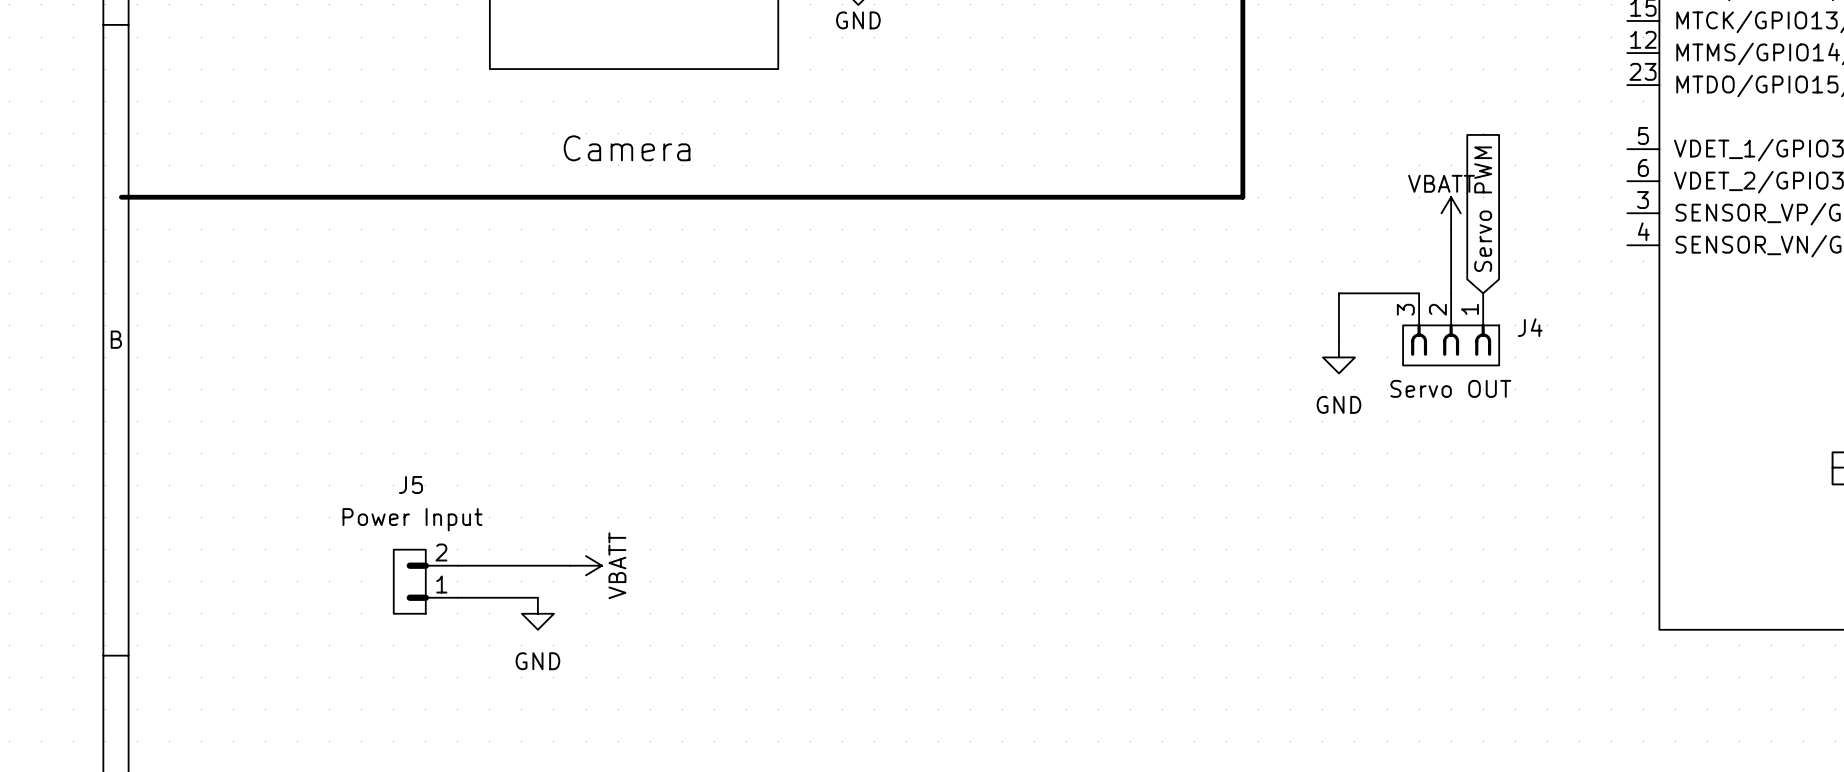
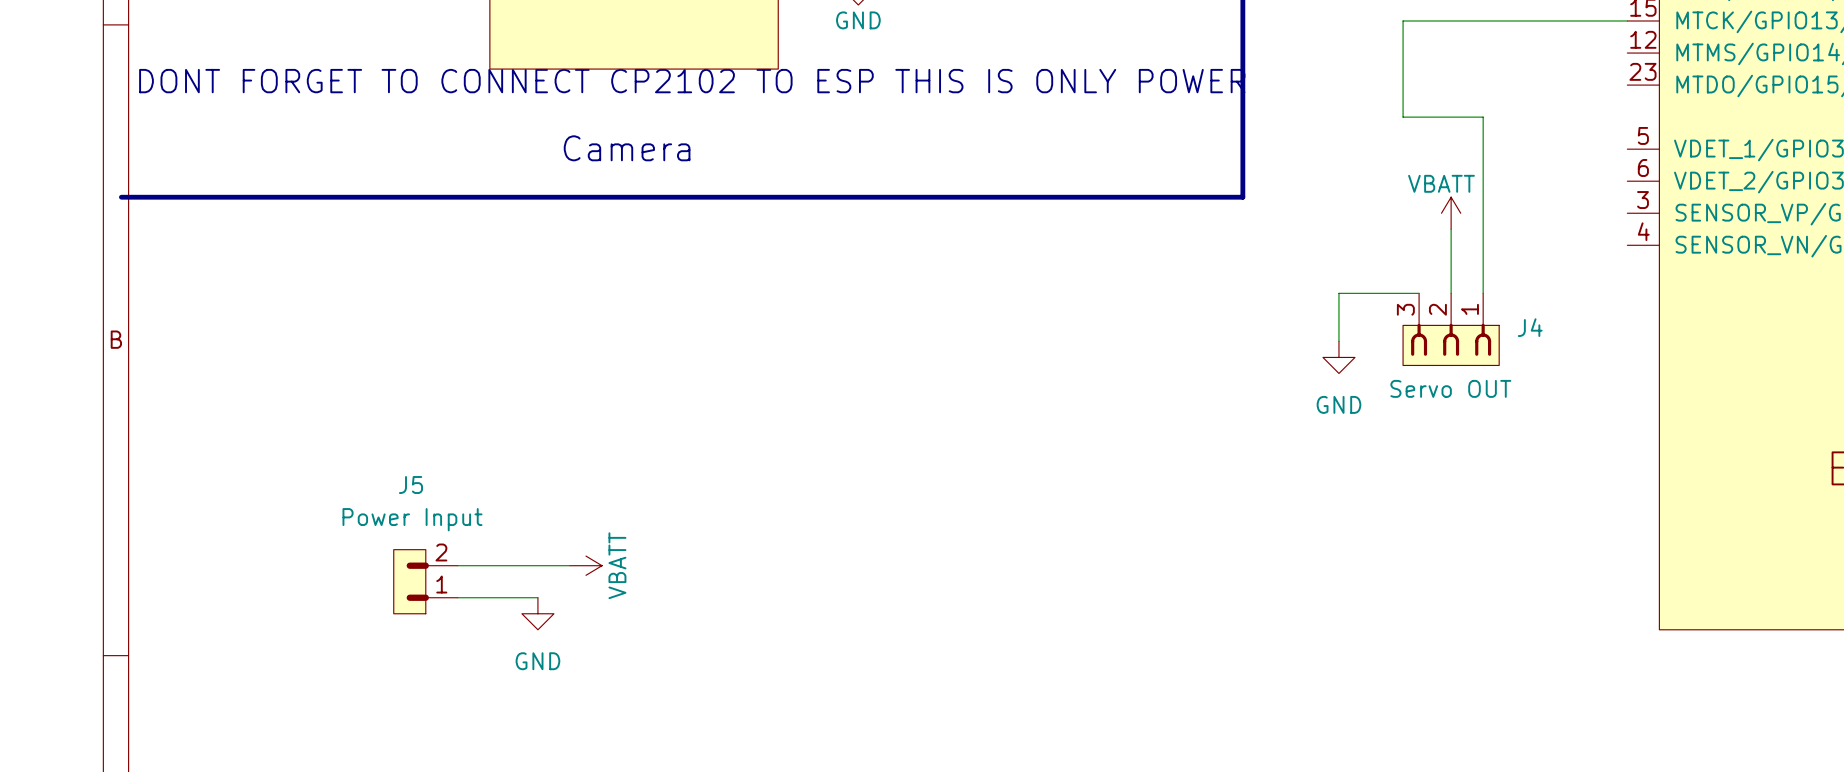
wire: none -> (1627, 21) (1403, 21) (1403, 117) (1483, 117) (1483, 293)
text: none -> DONT FORGET TO CONNECT CP2102 TO ESP THIS IS ONLY POWER (692, 81)
global label: Servo PWM (1483, 209) -> none

